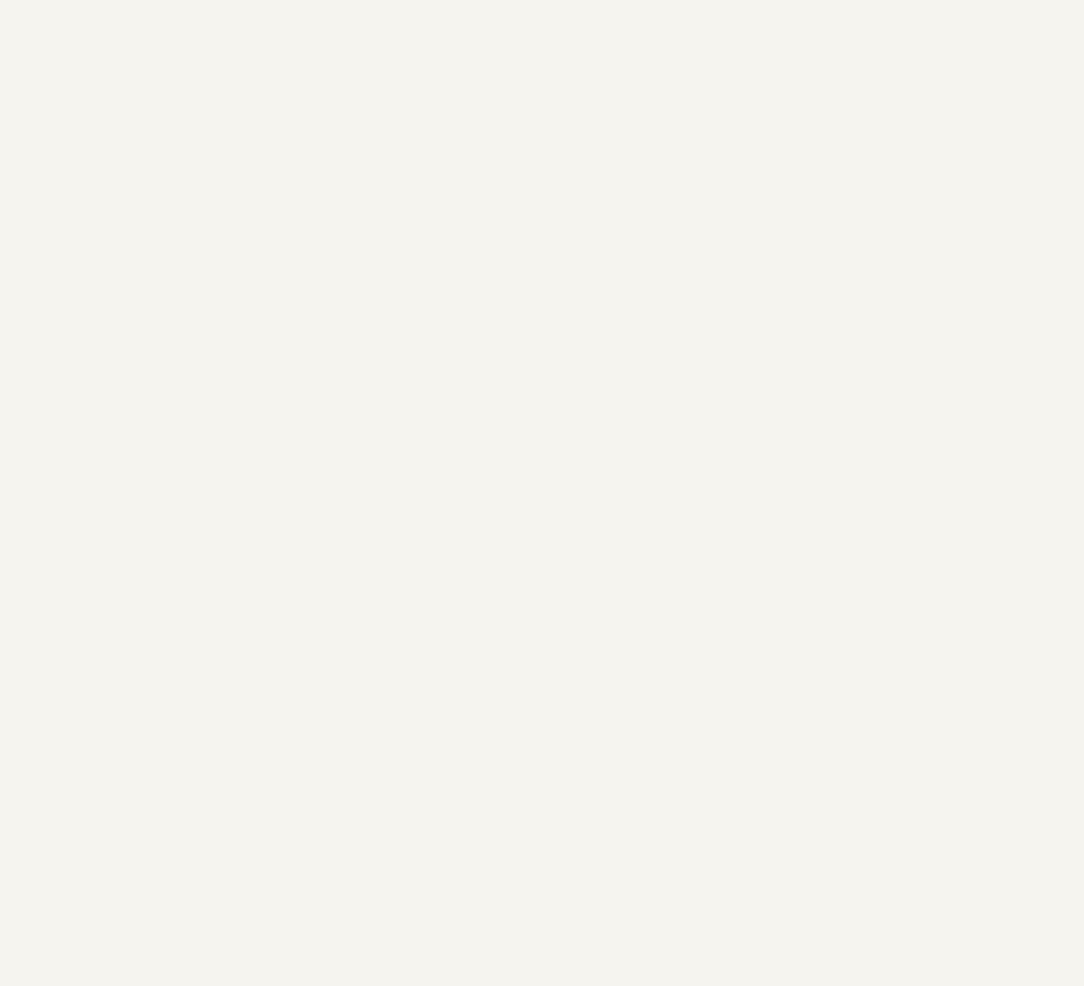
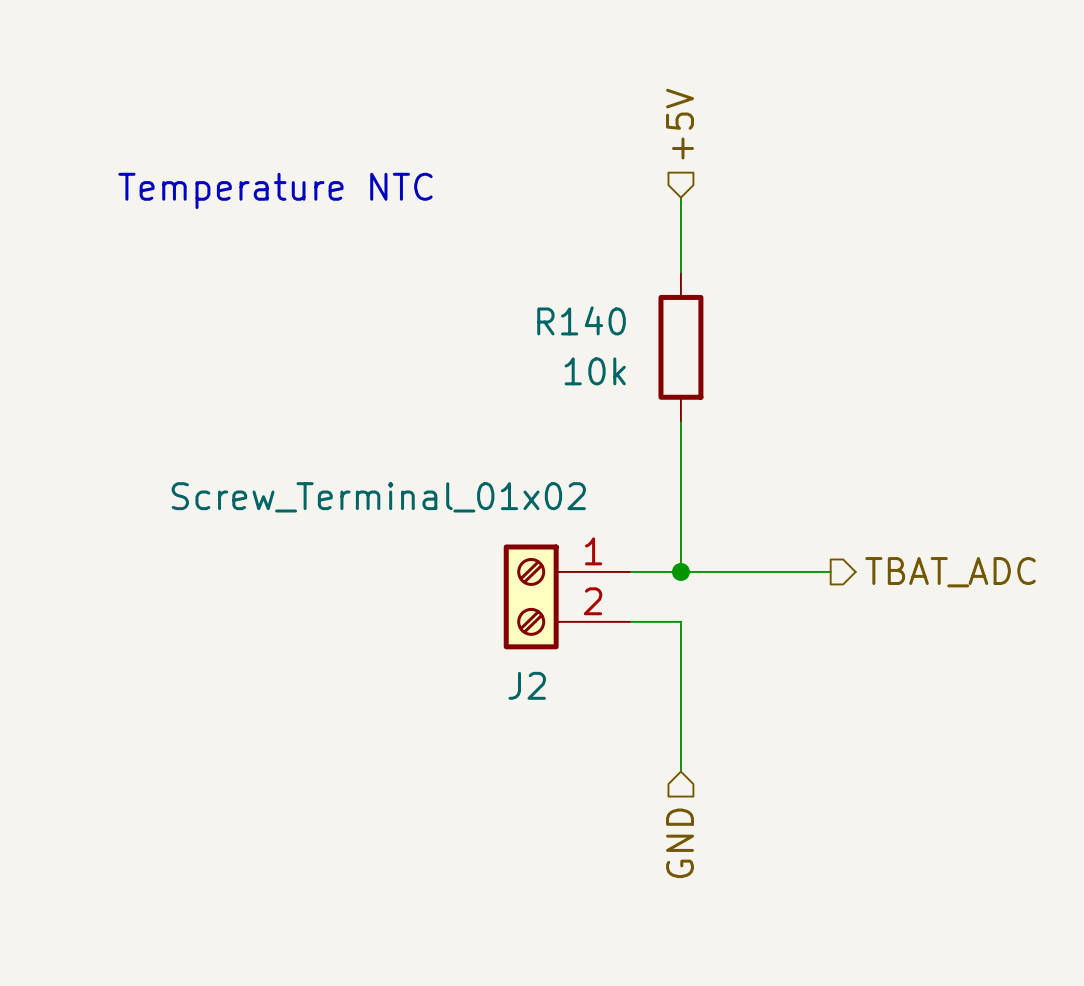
hierarchical label: none -> +5V (680, 124)
text: none -> Temperature NTC (275, 190)
wire: none -> (680, 197) (680, 272)
R140: none -> 10k (680, 347)
wire: none -> (680, 422) (680, 571)
wire: none -> (631, 571) (830, 571)
junction: none -> (680, 571)
hierarchical label: none -> TBAT_ADC (950, 572)
J2: none -> Screw_Terminal_01x02 (567, 596)
wire: none -> (631, 621) (680, 621) (680, 771)
hierarchical label: none -> GND (680, 843)

